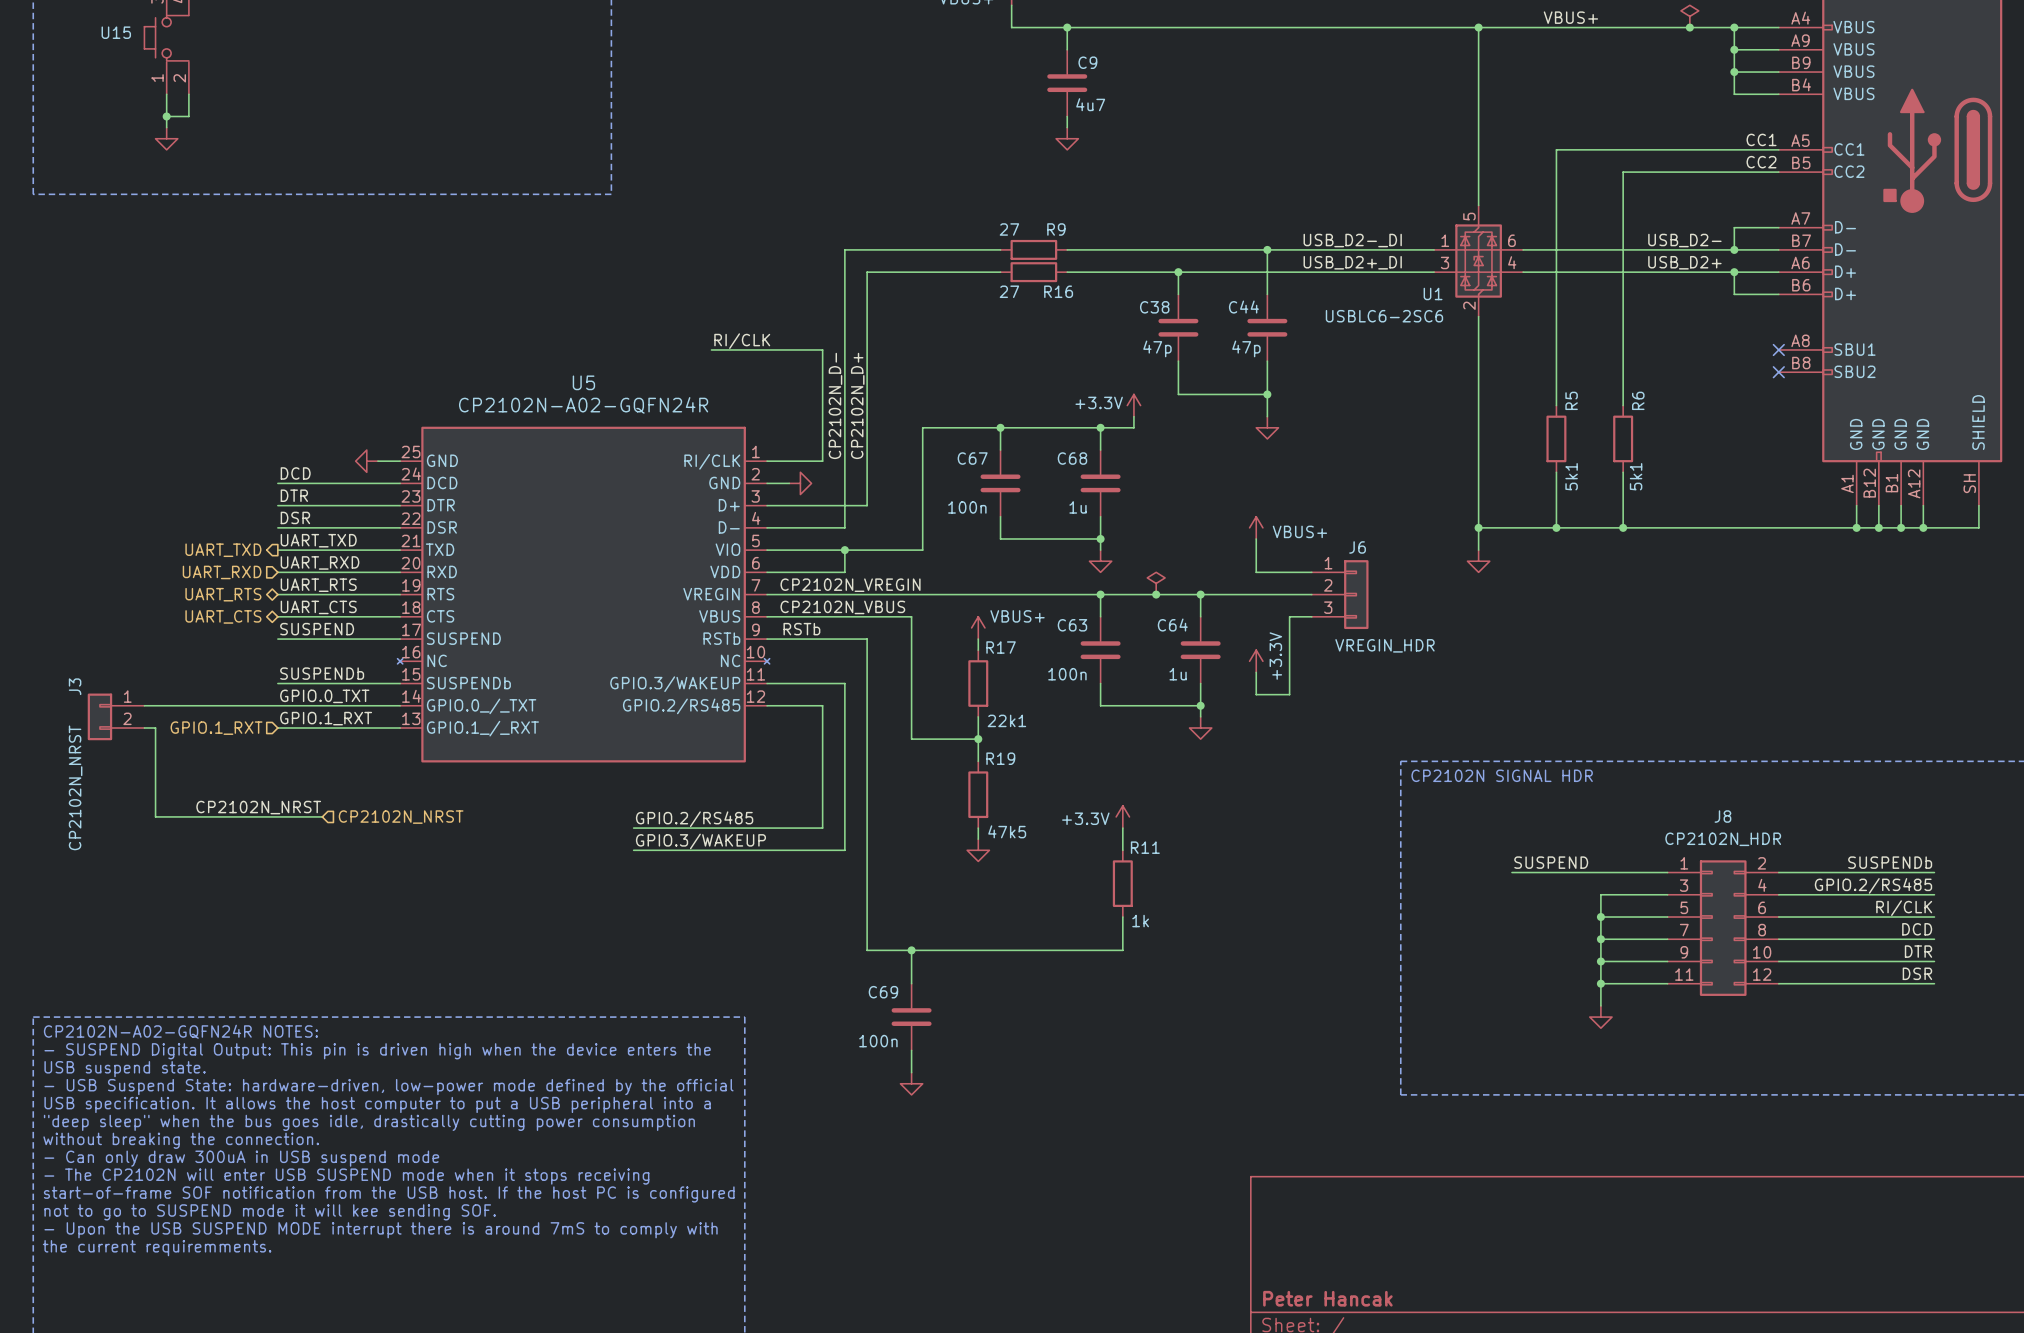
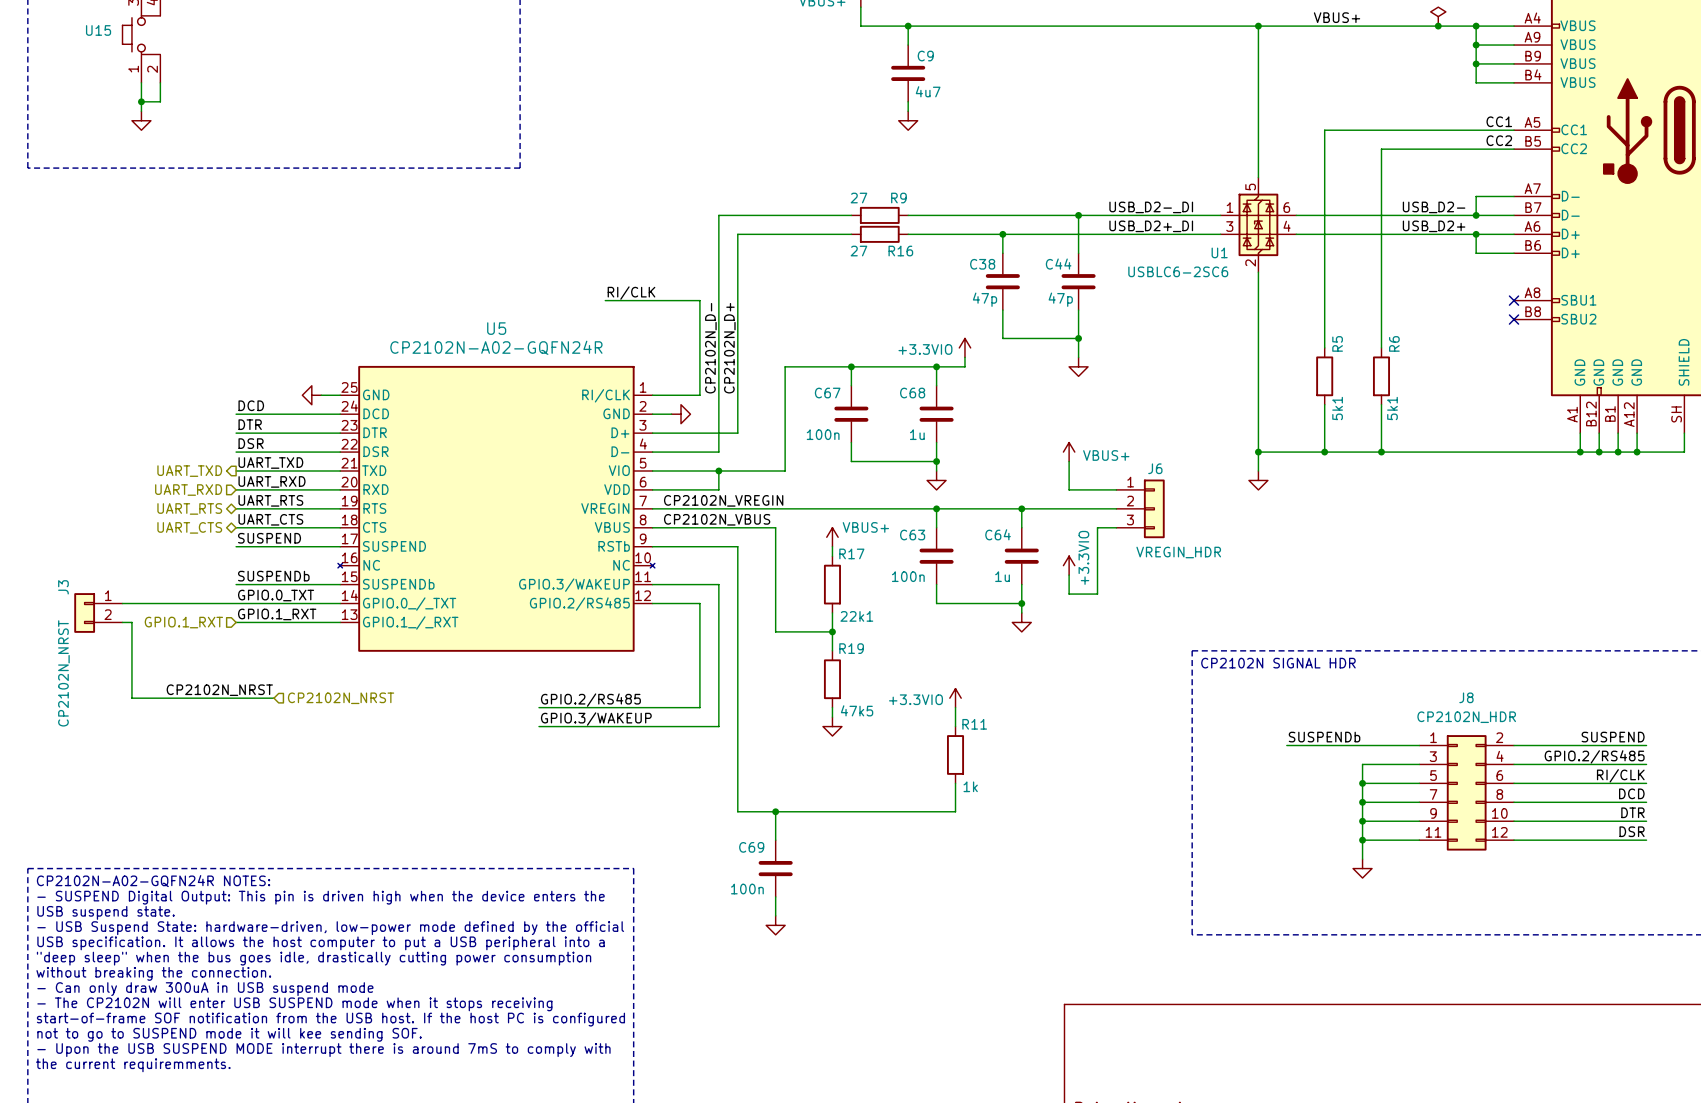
power symbol: +3.3V (1133, 405) -> +3.3VIO (964, 347)
power symbol: (1156, 583) -> none
junction: (1156, 594) -> none
label: RSTb (801, 629) -> none
power symbol: +3.3V (1256, 661) -> +3.3VIO (1069, 565)
power symbol: +3.3V (1122, 816) -> +3.3VIO (955, 698)
label: SUSPEND (1551, 862) -> SUSPENDb (1324, 737)
label: SUSPENDb (1890, 862) -> SUSPEND (1613, 737)

